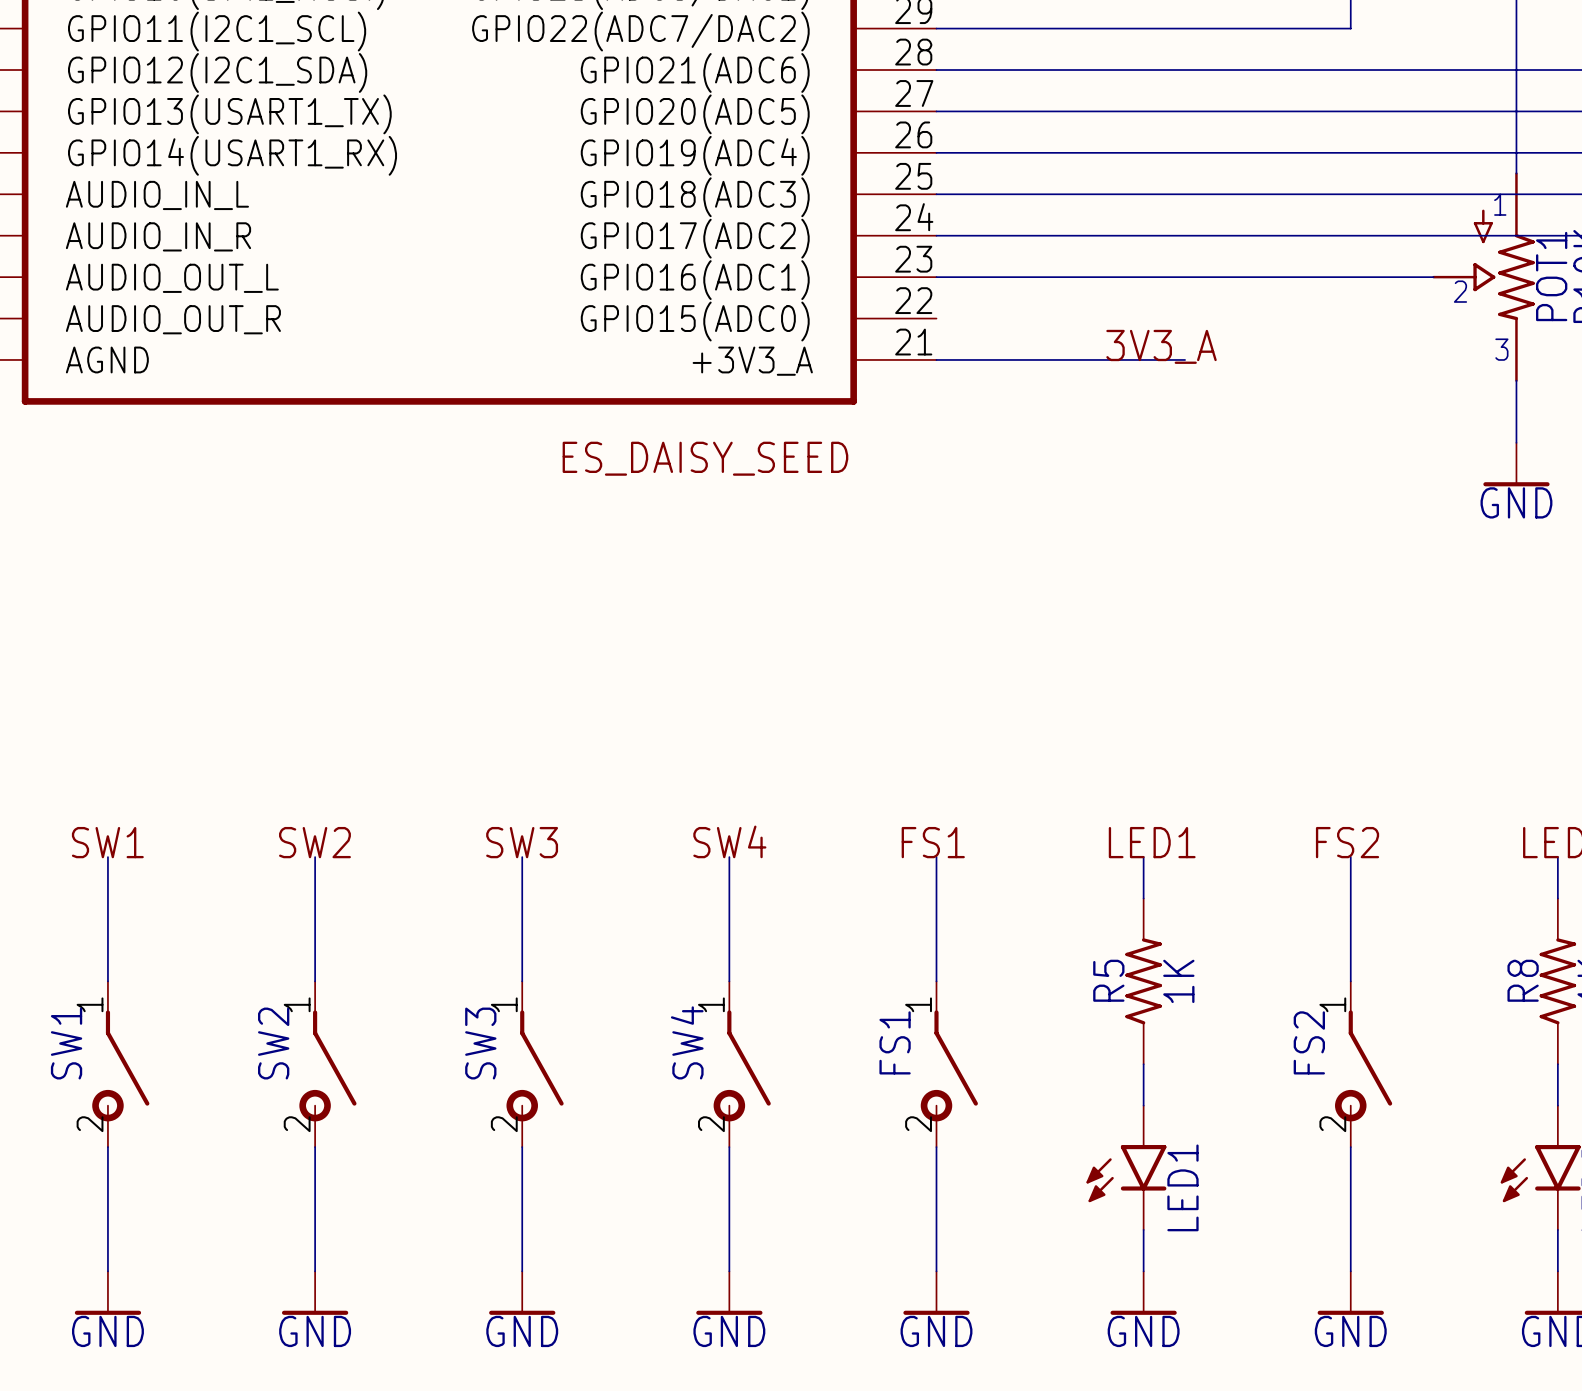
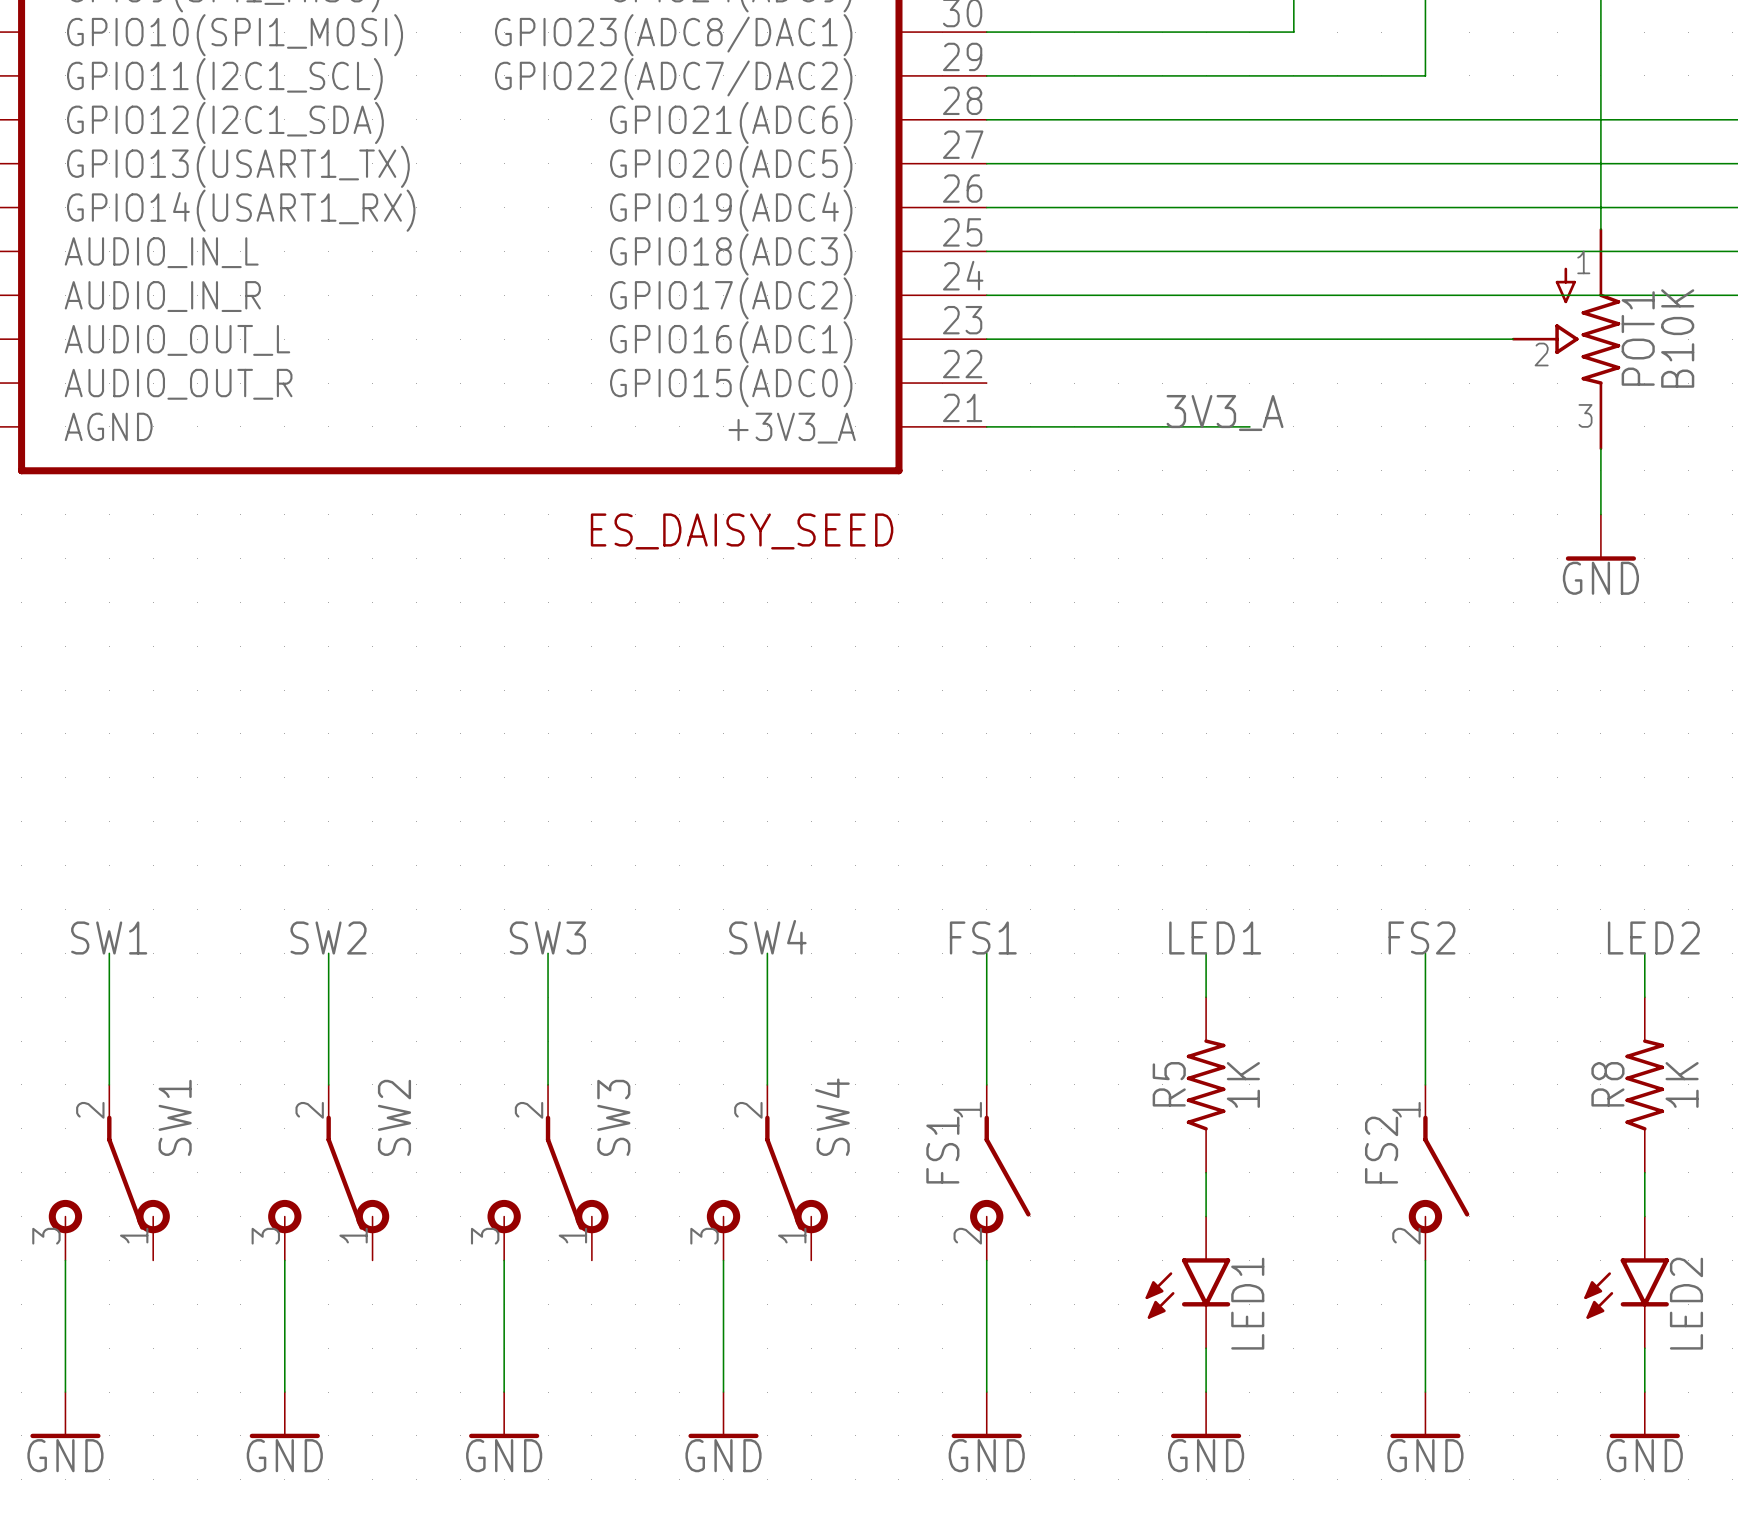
SW1 symbol: [92, 981, 150, 1148] -> [48, 1084, 170, 1261]
SW2 symbol: [299, 981, 357, 1148] -> [268, 1084, 390, 1261]
SW3 symbol: [506, 981, 564, 1148] -> [487, 1084, 609, 1261]
SW4 symbol: [713, 981, 771, 1148] -> [706, 1084, 828, 1261]
SW4 name position: SW4 (687, 1042) -> SW4 (832, 1117)
SW1 name position: SW1 (66, 1043) -> SW1 (175, 1117)
SW2 name position: SW2 (273, 1043) -> SW2 (394, 1117)
SW3 name position: SW3 (480, 1043) -> SW3 (613, 1117)
wire: (107, 1147) (107, 1271) -> (65, 1260) (65, 1392)
wire: (315, 1147) (315, 1271) -> (284, 1260) (284, 1392)
wire: (522, 1147) (522, 1271) -> (504, 1260) (504, 1392)
wire: (729, 1147) (729, 1271) -> (723, 1260) (723, 1392)
power symbol position: GND (107, 1293) -> GND (65, 1415)
power symbol position: GND (315, 1293) -> GND (284, 1415)
power symbol position: GND (522, 1293) -> GND (504, 1415)
power symbol position: GND (729, 1293) -> GND (723, 1415)

